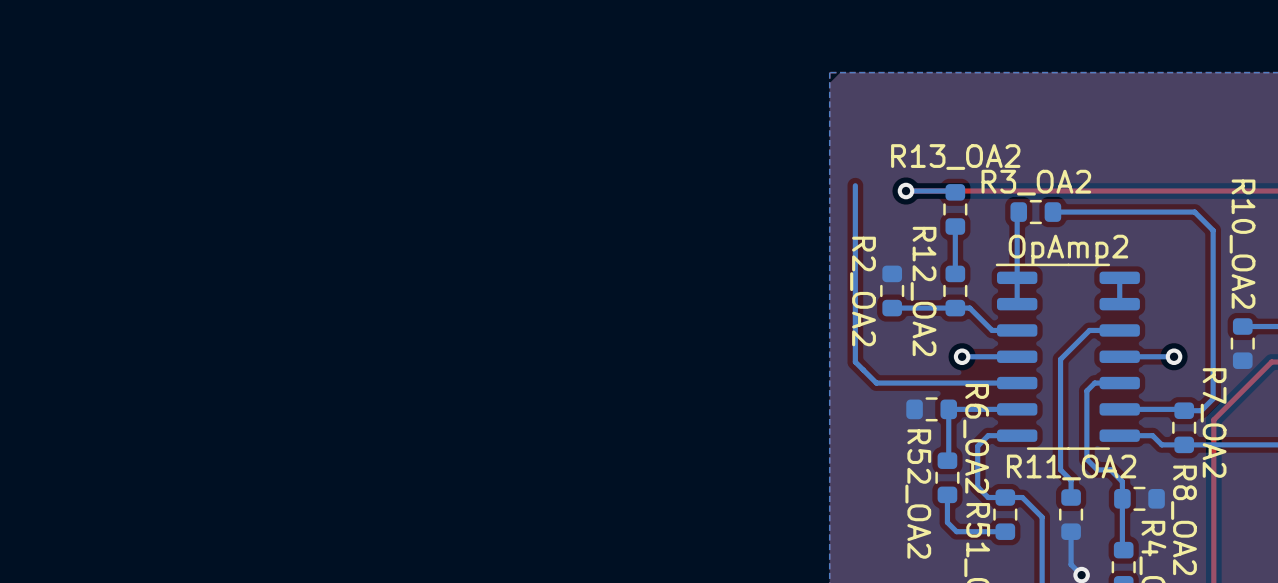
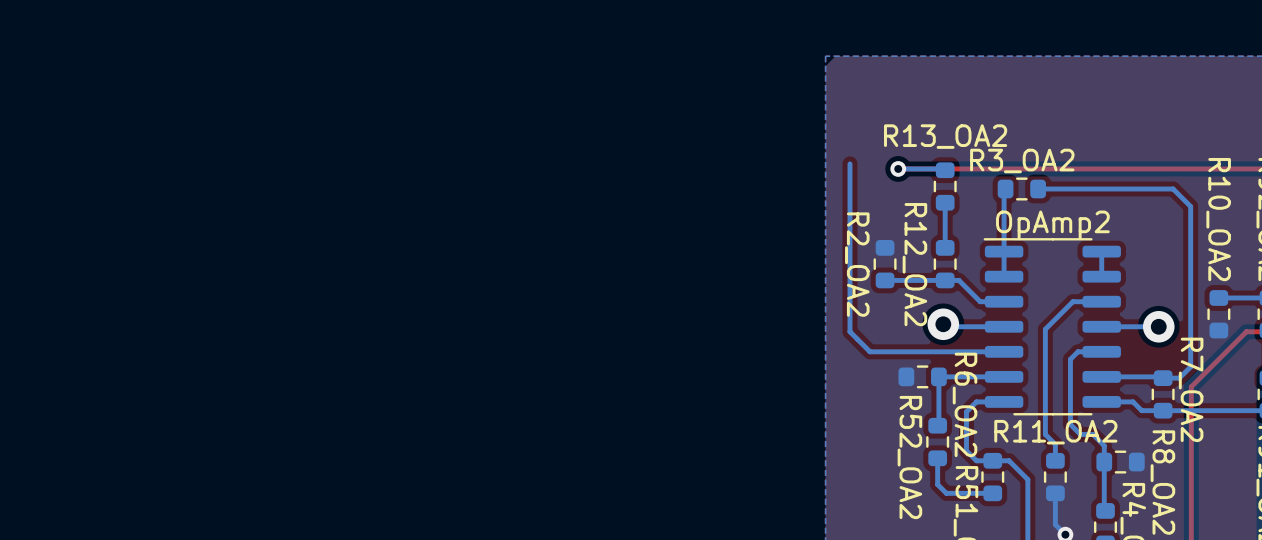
via size: [953, 348, 971, 366] -> [927, 308, 960, 341]
via size: [1165, 348, 1183, 366] -> [1142, 310, 1175, 343]

